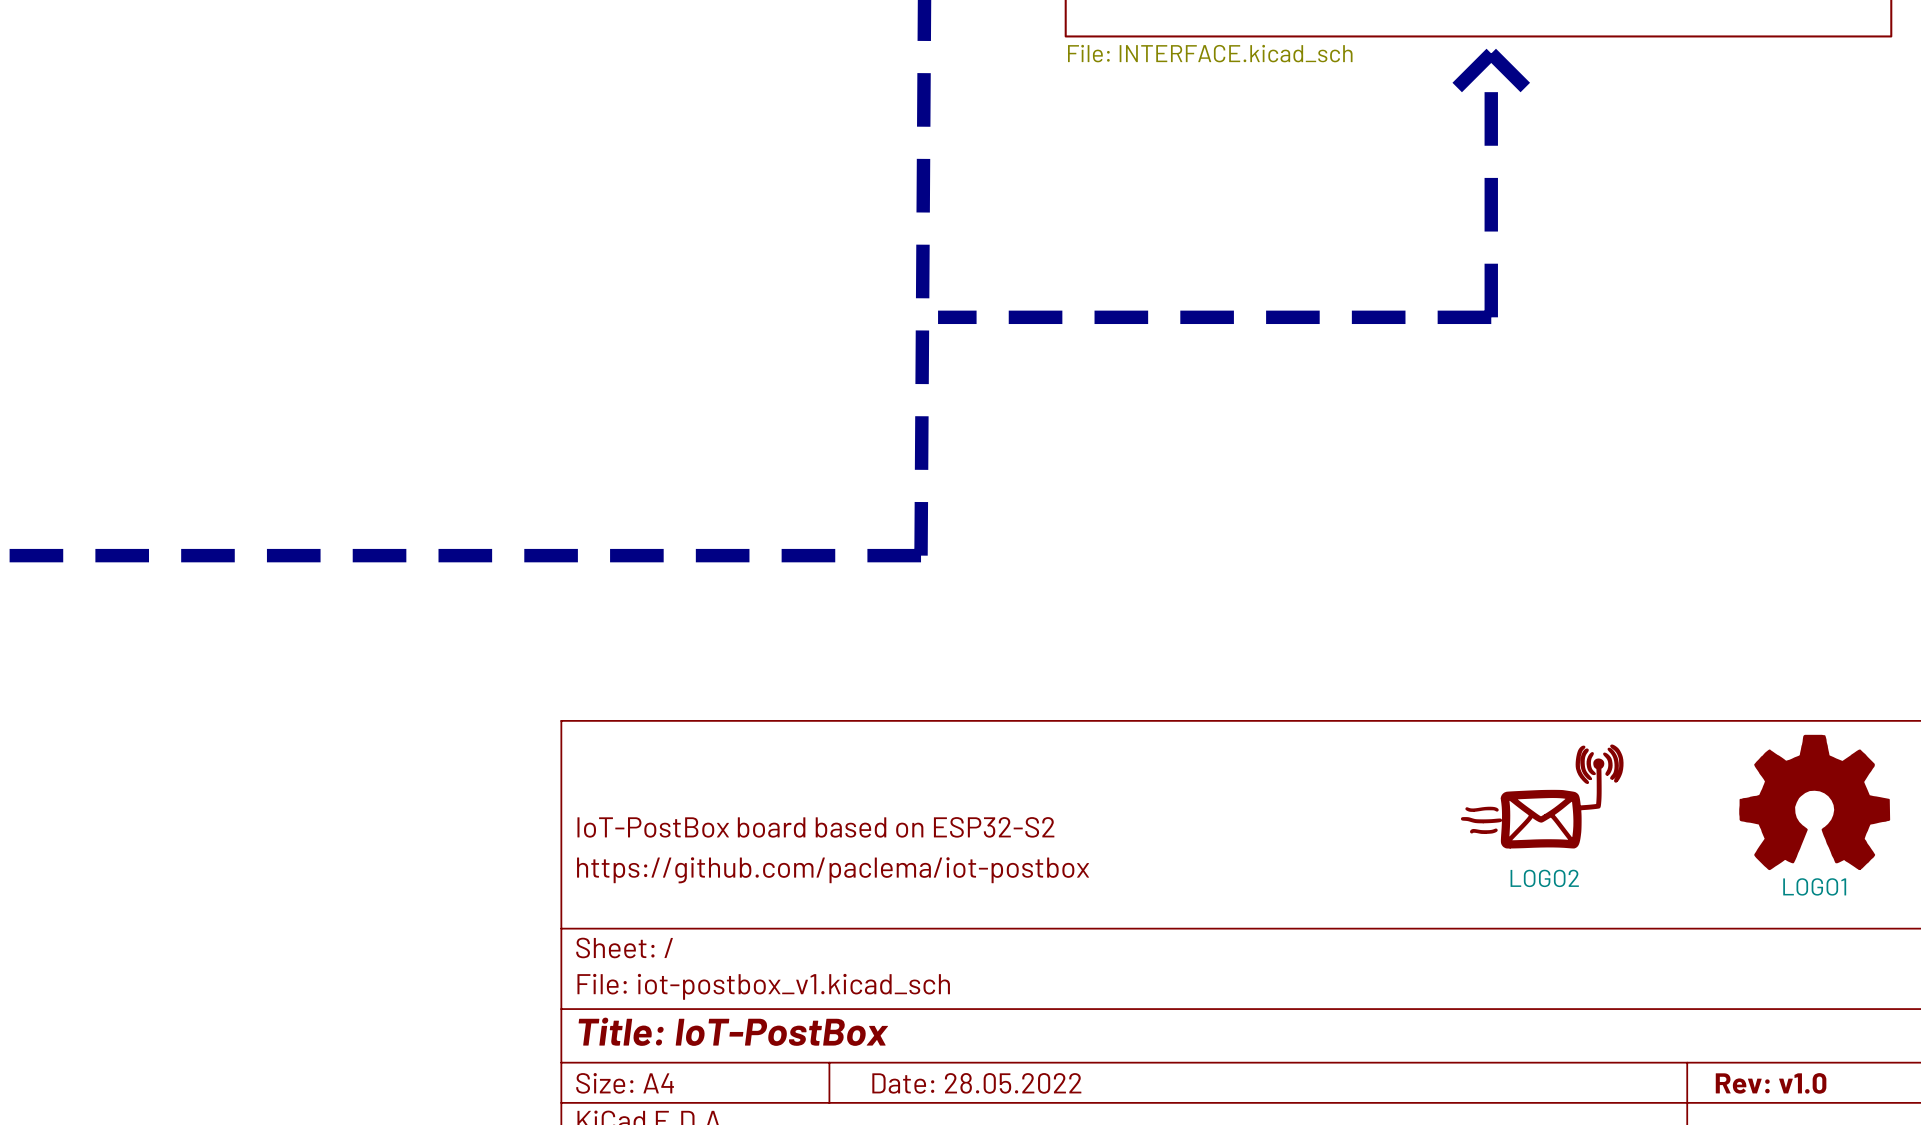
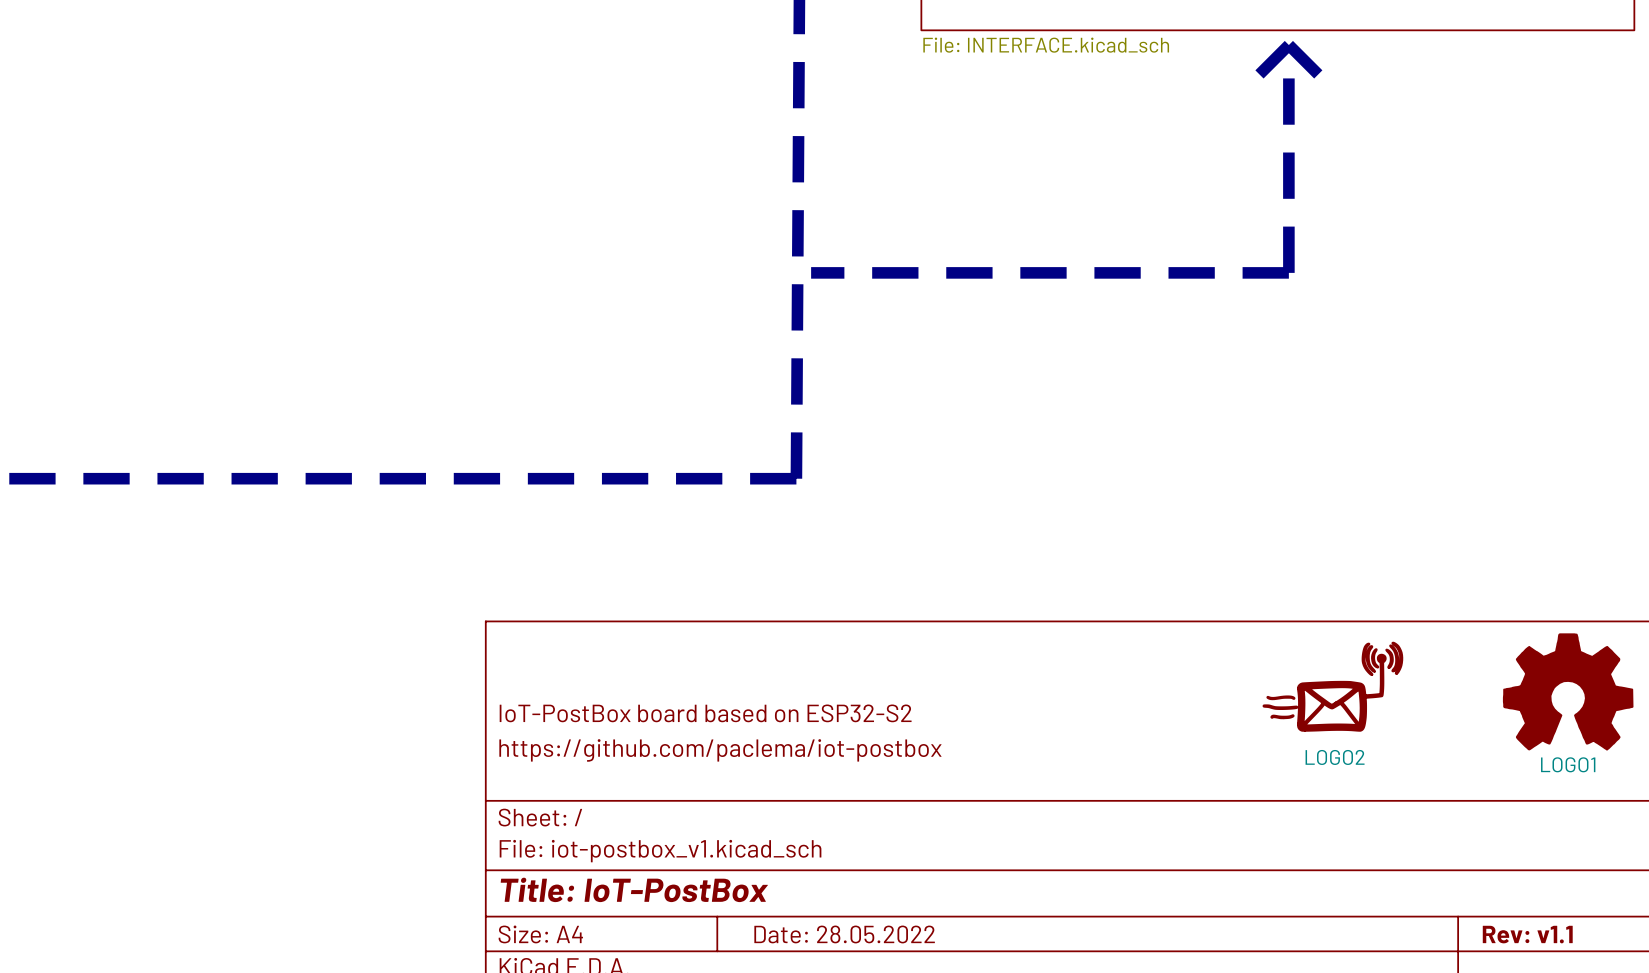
title block: Rev: v1.0 (1771, 1083) -> Rev: v1.1 (1527, 934)

